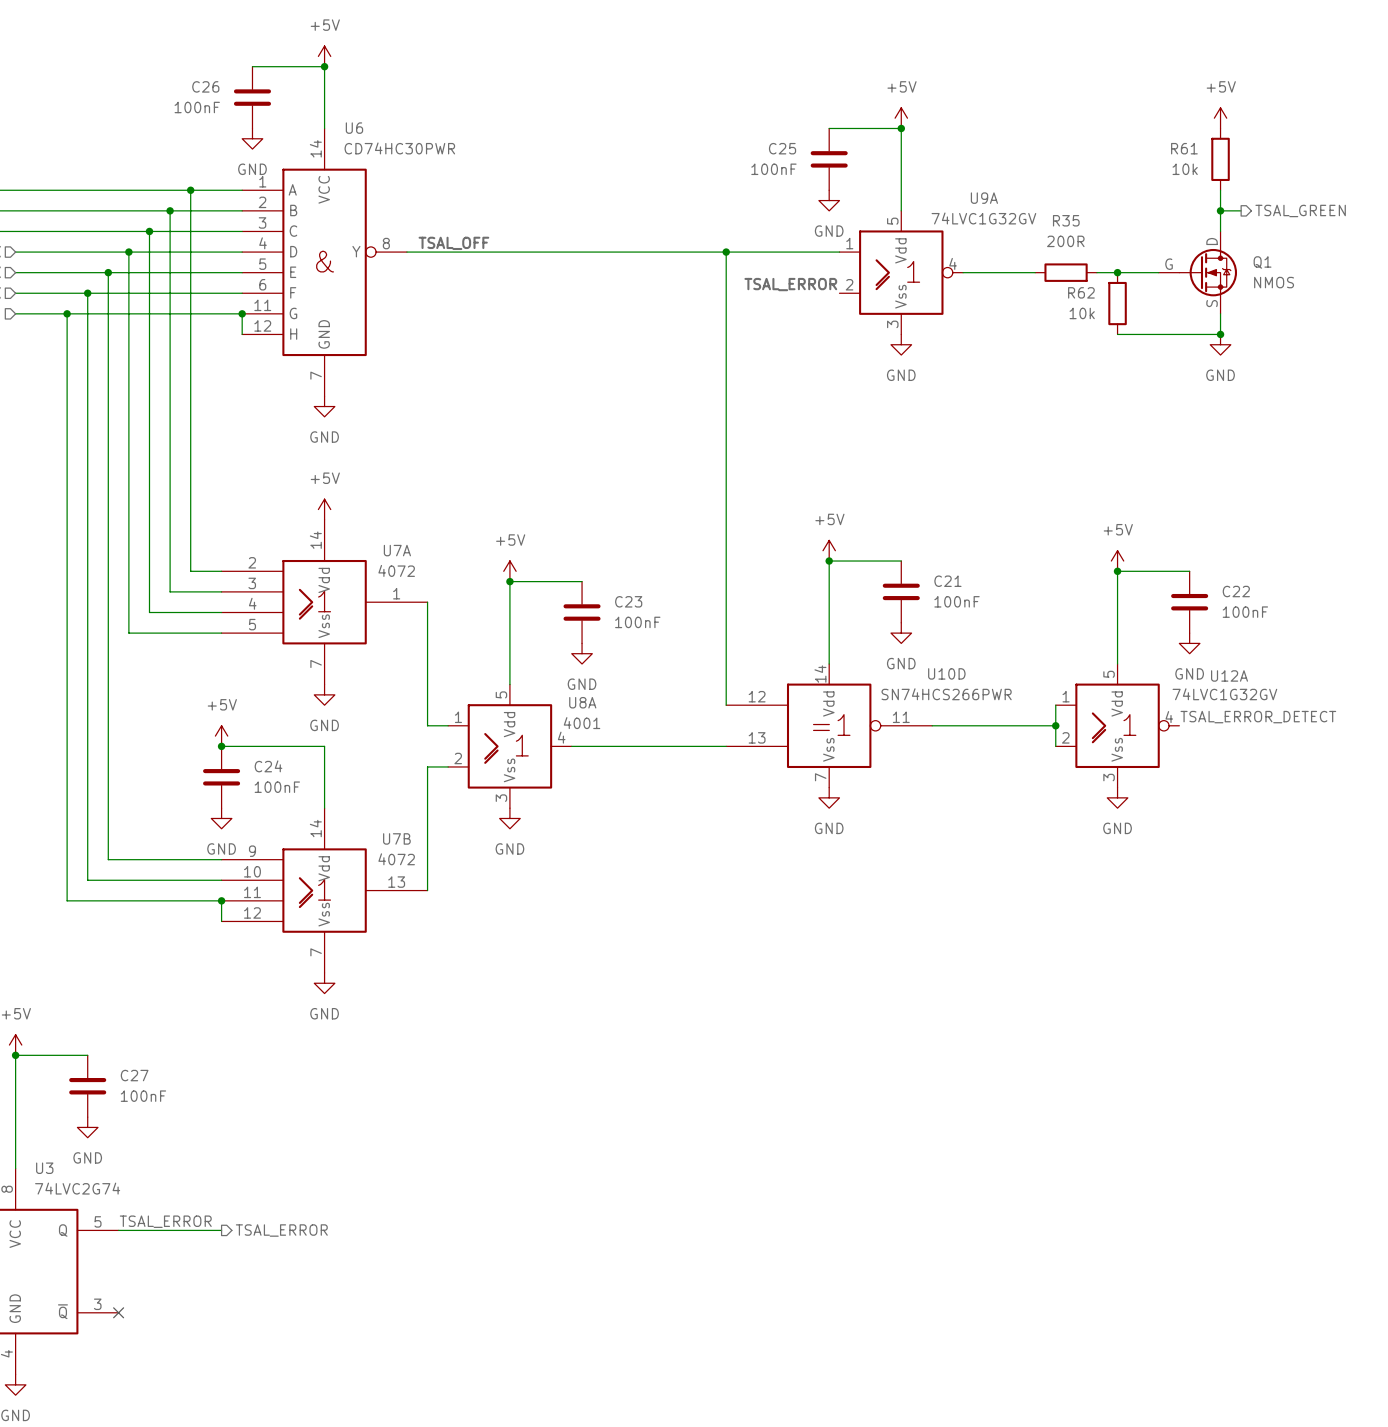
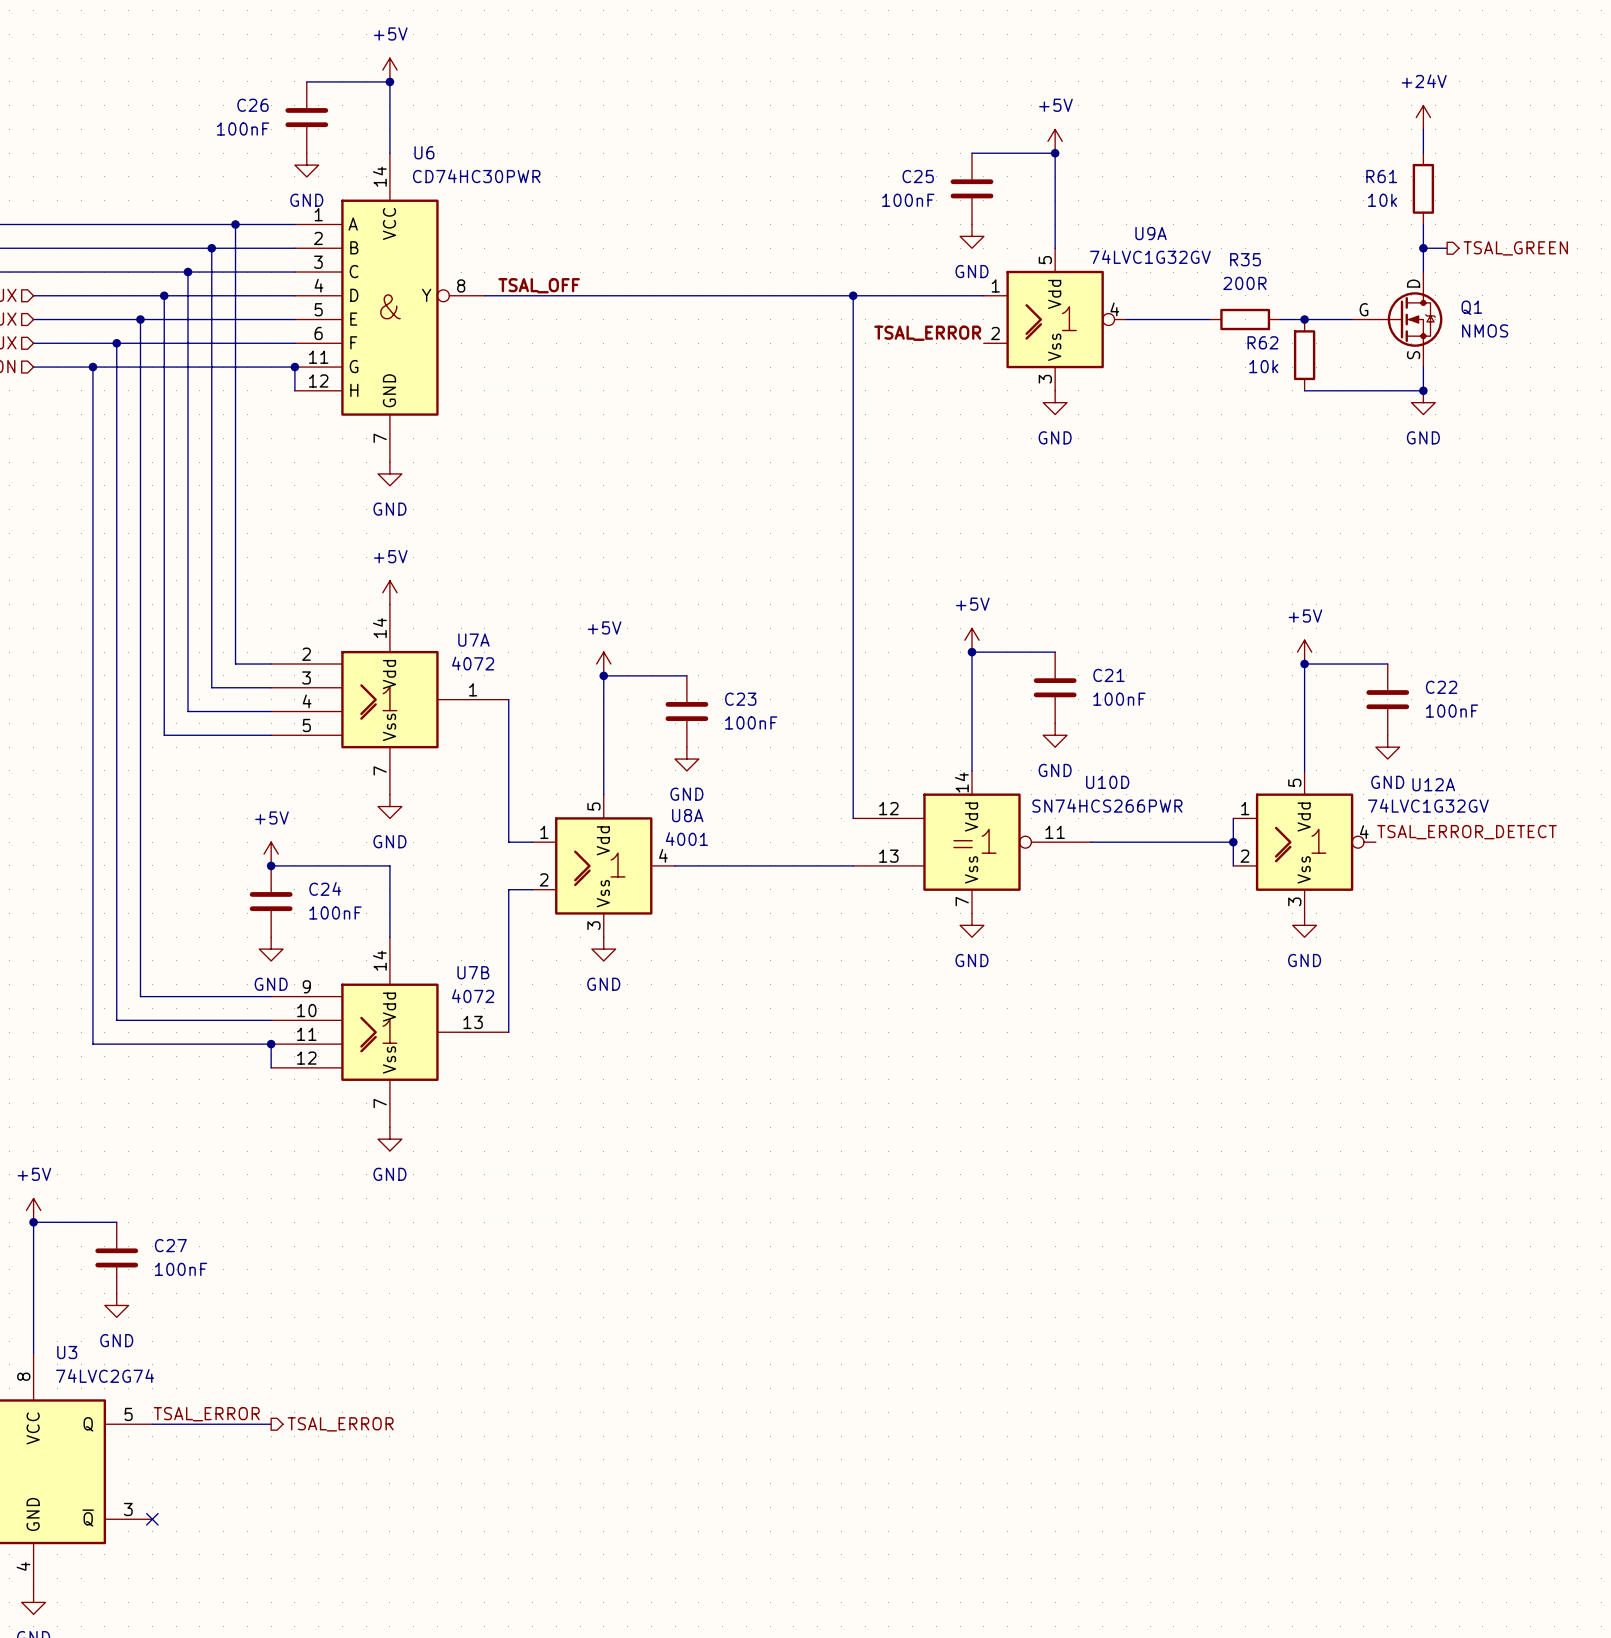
power symbol: none -> +24V (1423, 117)
power symbol: +5V (1220, 118) -> none

